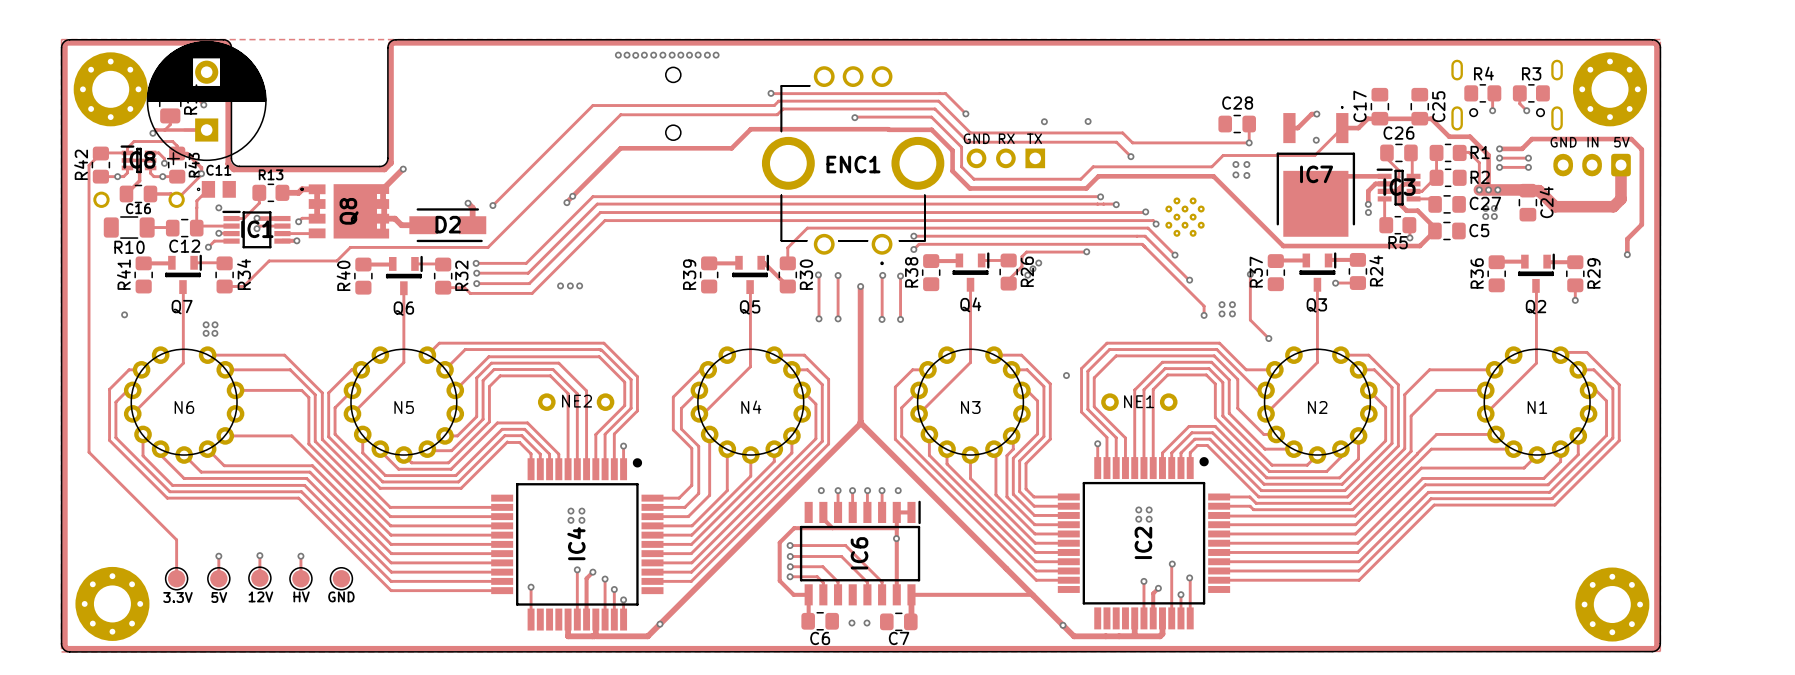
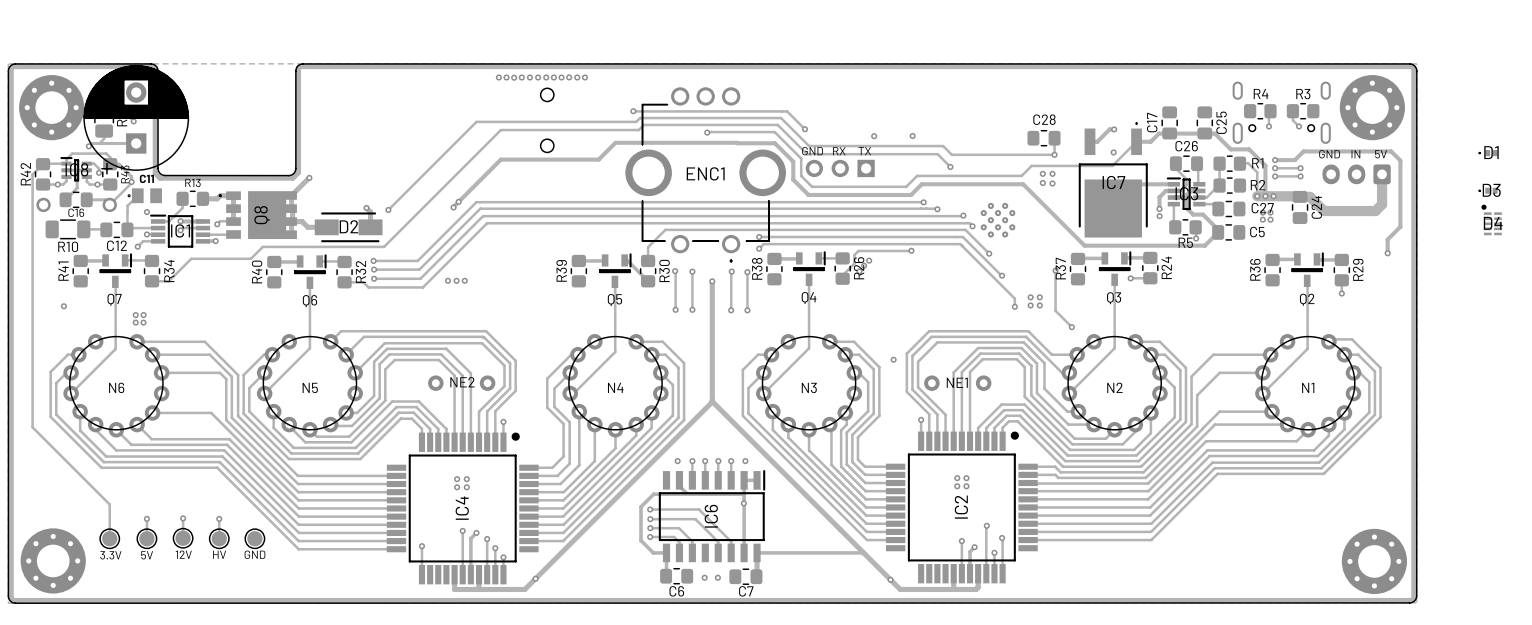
D1: none -> (1488, 153)
D3: none -> (1488, 190)
D4: none -> (1491, 219)

